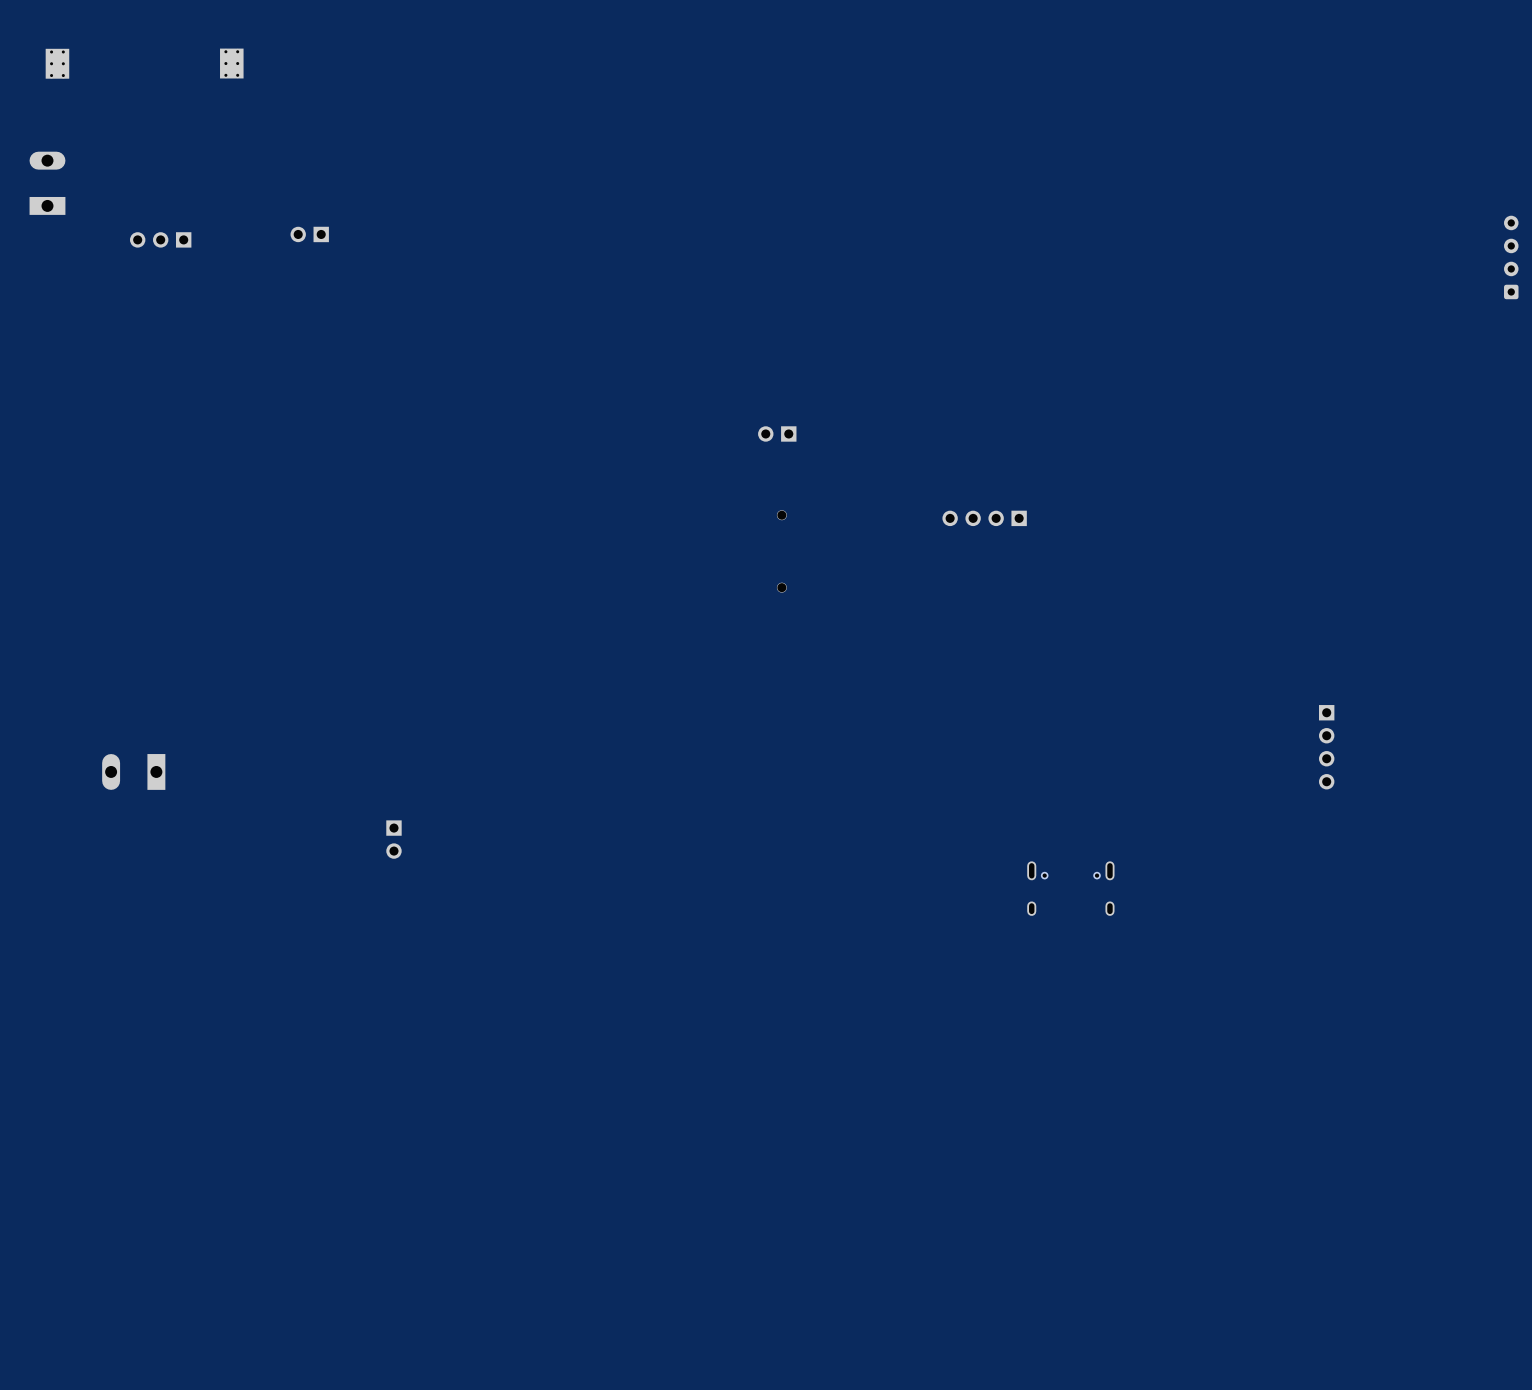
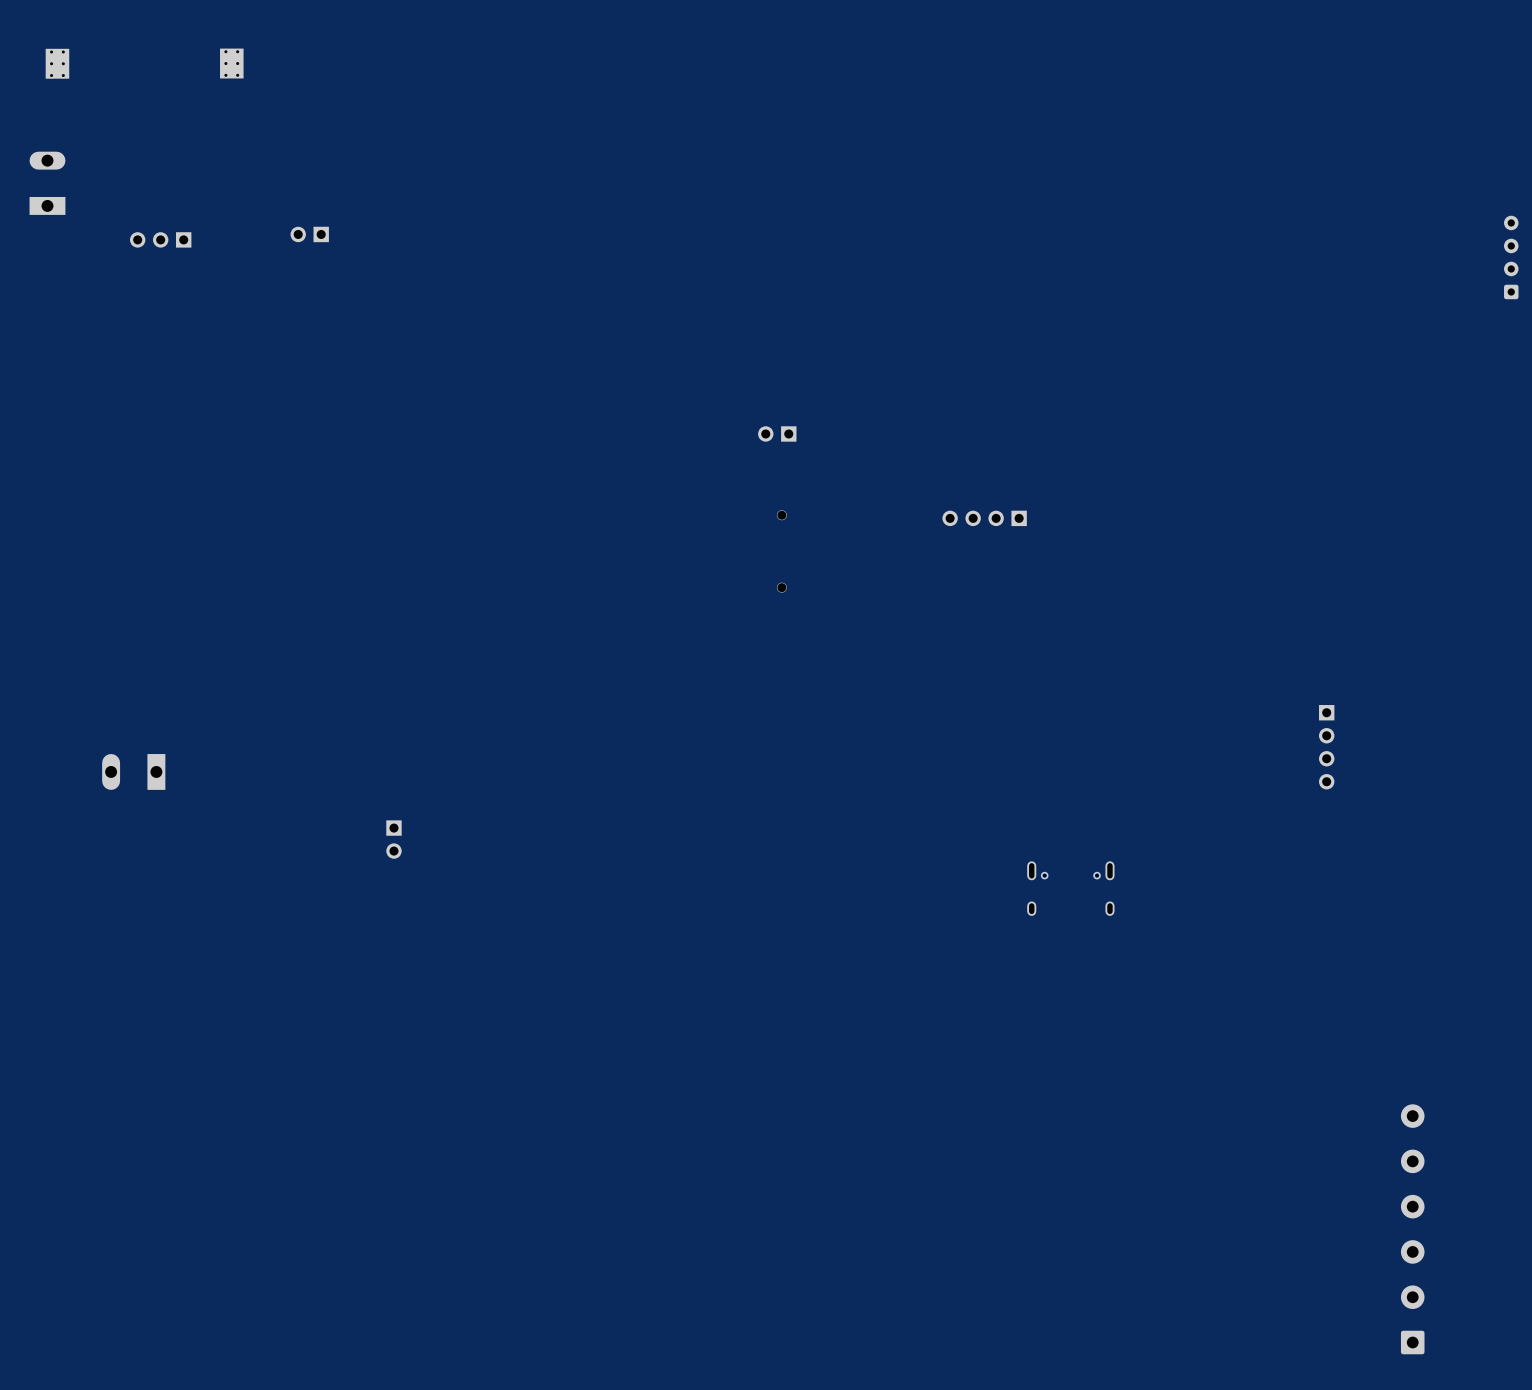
part: none -> (1412, 1229)

